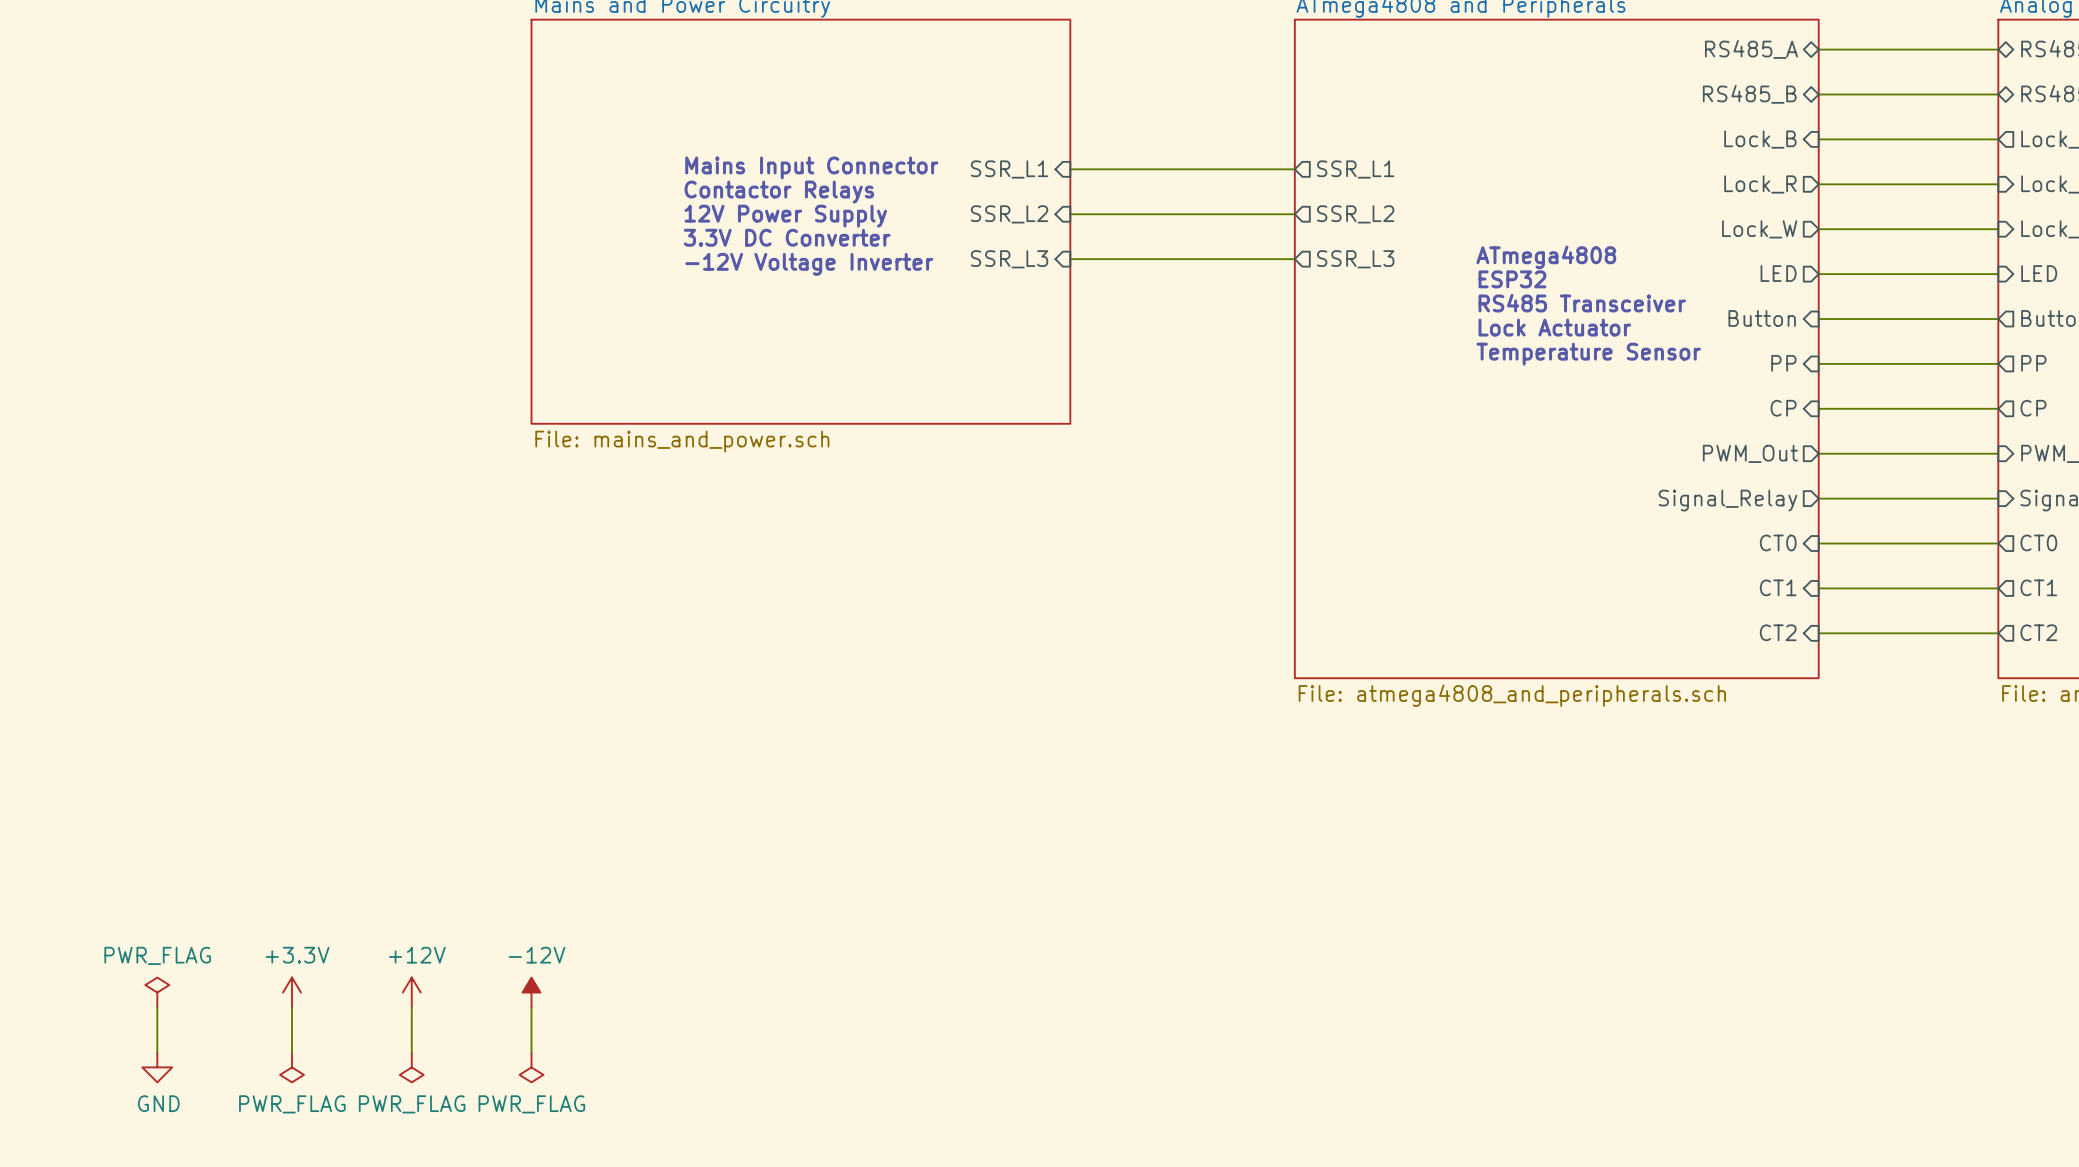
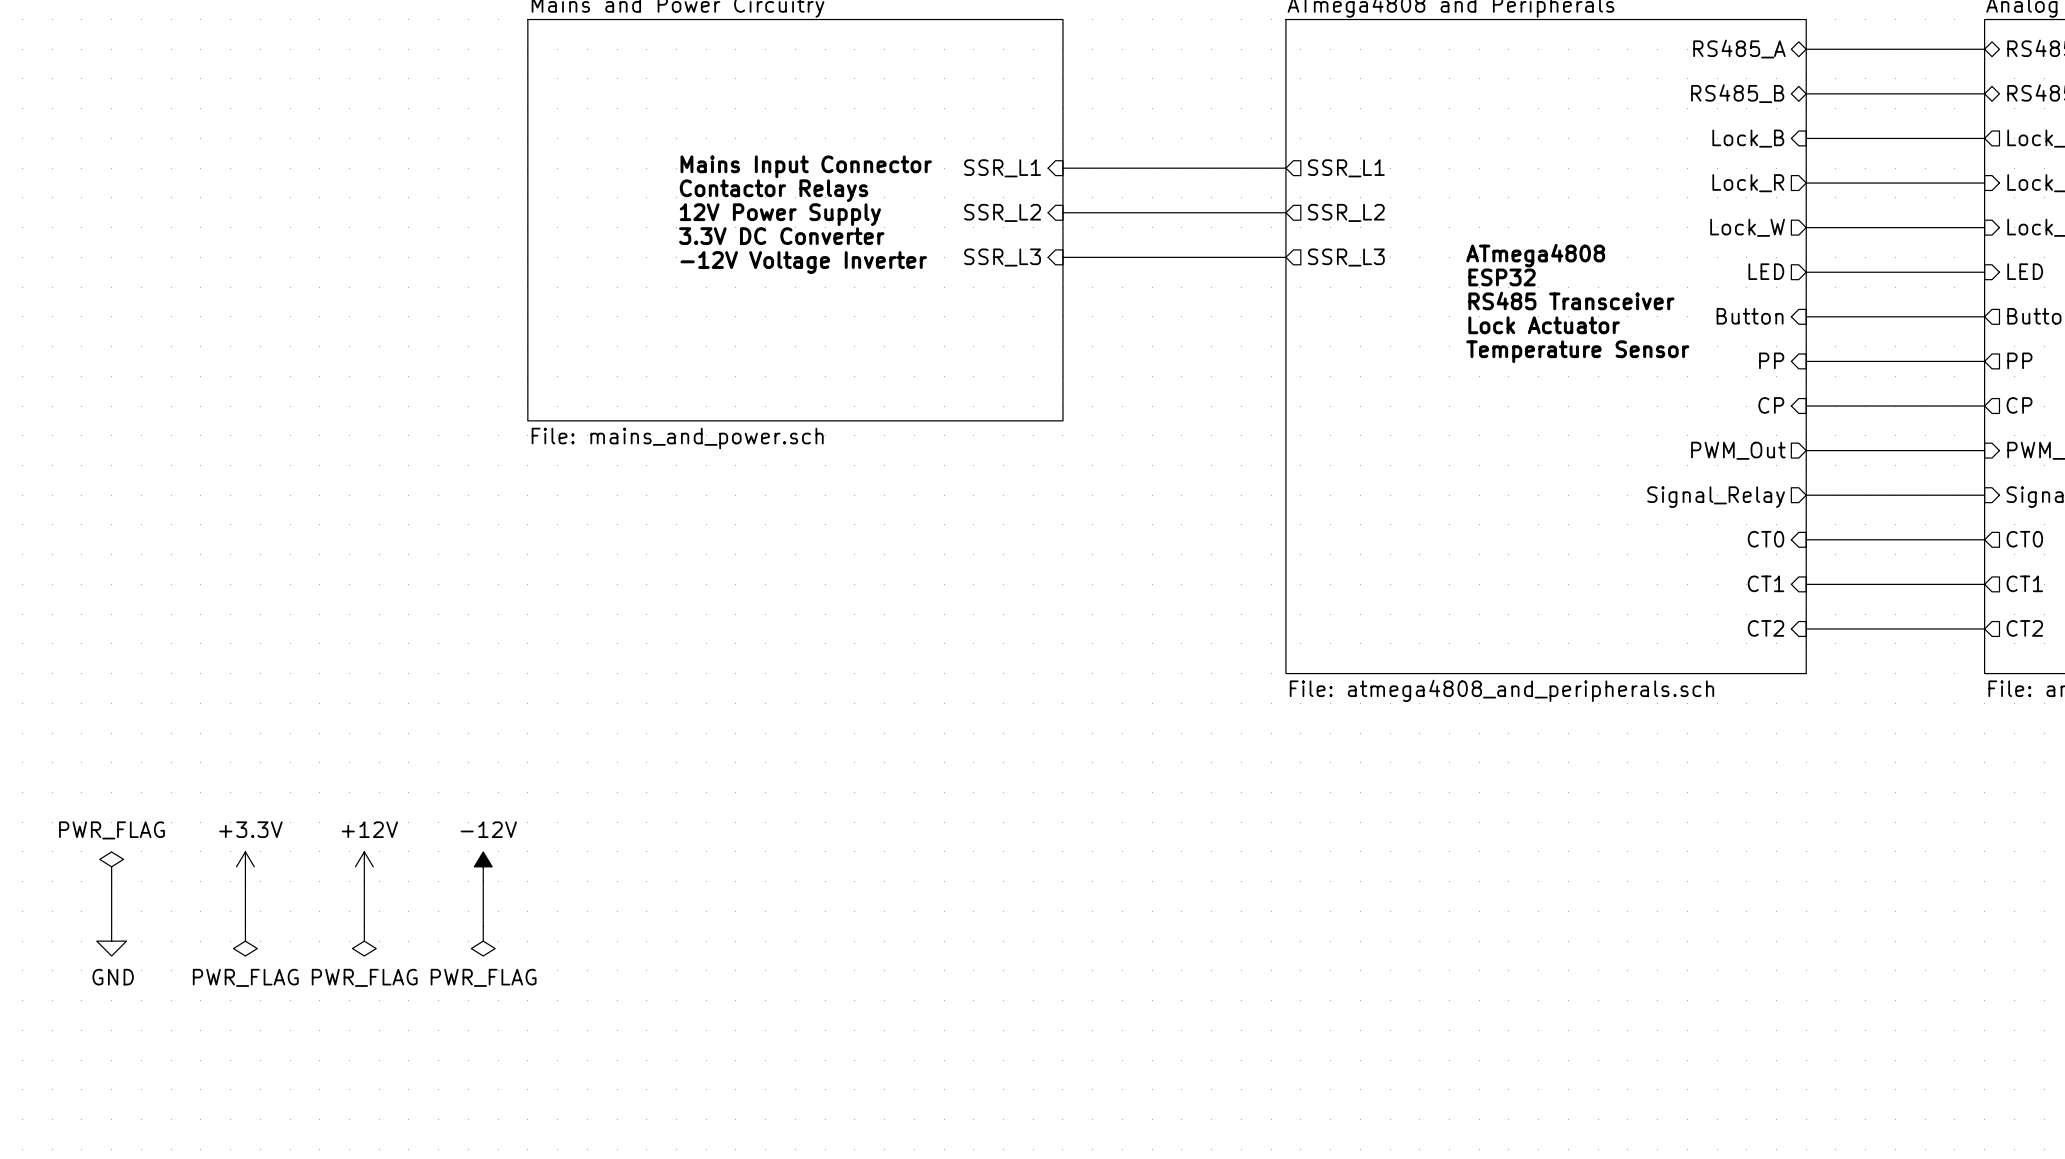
power symbol: none -> PWR_FLAG (111, 866)
power symbol: none -> PWR_FLAG (245, 941)
power symbol: none -> PWR_FLAG (364, 941)
power symbol: none -> PWR_FLAG (483, 941)
power symbol: PWR_FLAG (157, 992) -> none
power symbol position: +3.3V (292, 992) -> +3.3V (245, 866)
power symbol position: +12V (411, 992) -> +12V (364, 866)
power symbol position: -12V (531, 992) -> -12V (483, 866)
wire: (157, 1007) (157, 1052) -> (111, 881) (111, 926)
wire: (292, 1007) (292, 1052) -> (245, 881) (245, 926)
wire: (411, 1007) (411, 1052) -> (364, 881) (364, 926)
wire: (531, 1007) (531, 1052) -> (483, 881) (483, 926)
power symbol position: GND (157, 1067) -> GND (111, 941)
power symbol: PWR_FLAG (292, 1067) -> none
power symbol: PWR_FLAG (411, 1067) -> none
power symbol: PWR_FLAG (531, 1067) -> none

